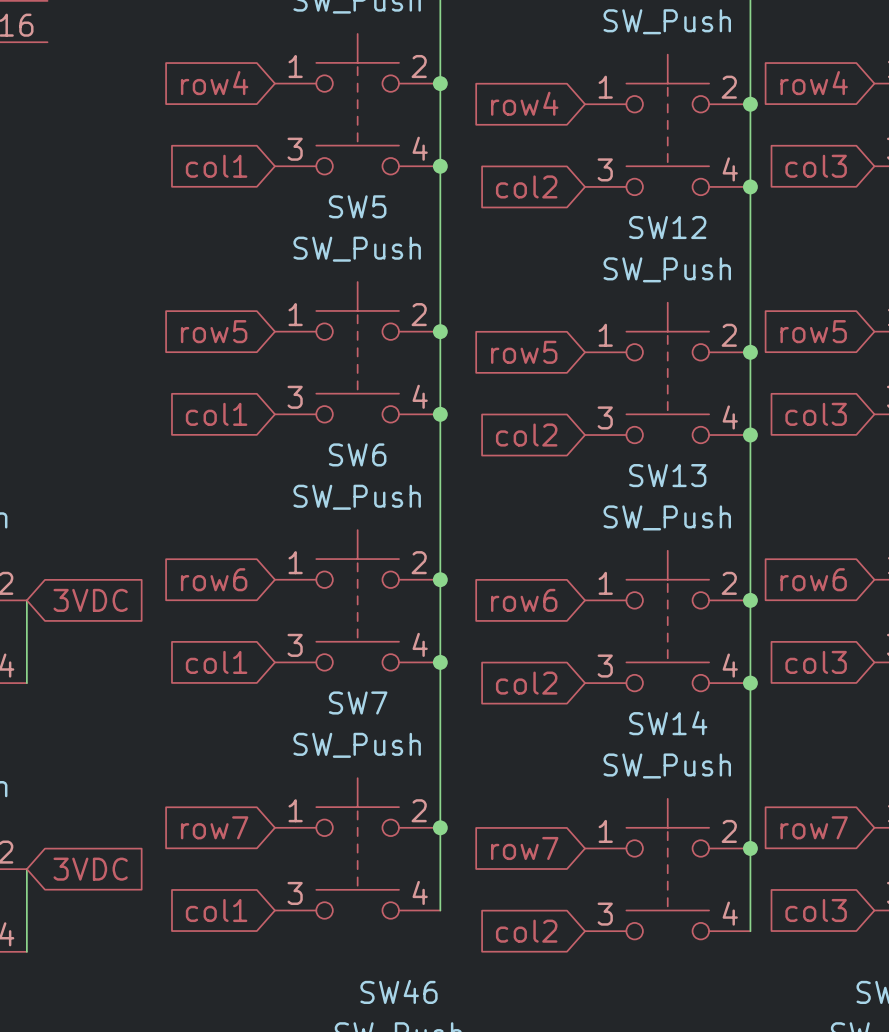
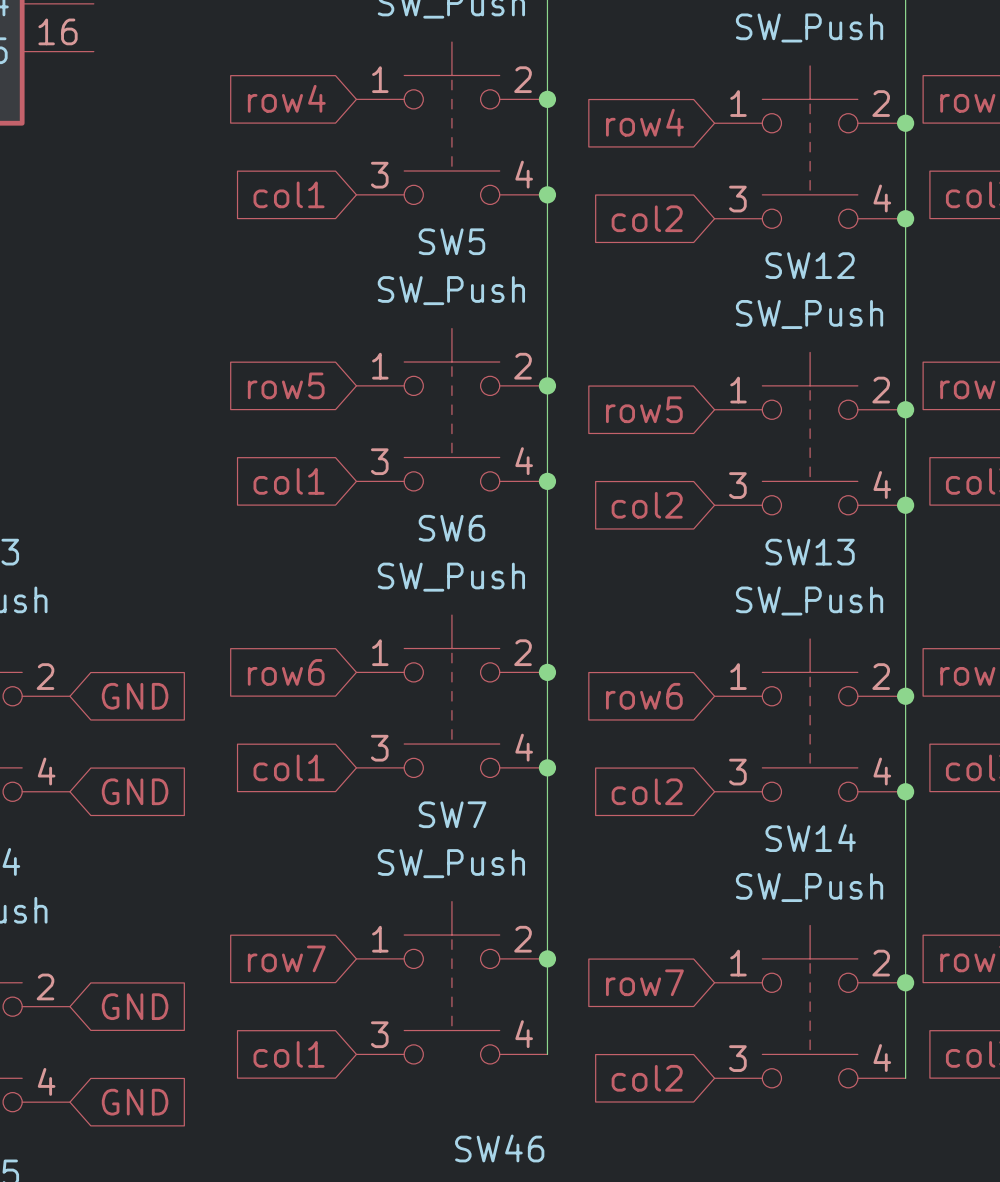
wire: (26, 600) (26, 683) -> none
global label: 3VDC (90, 600) -> GND (135, 696)
global label: none -> GND (135, 791)
wire: (26, 869) (26, 951) -> none
global label: 3VDC (90, 869) -> GND (135, 1006)
global label: none -> GND (135, 1102)

